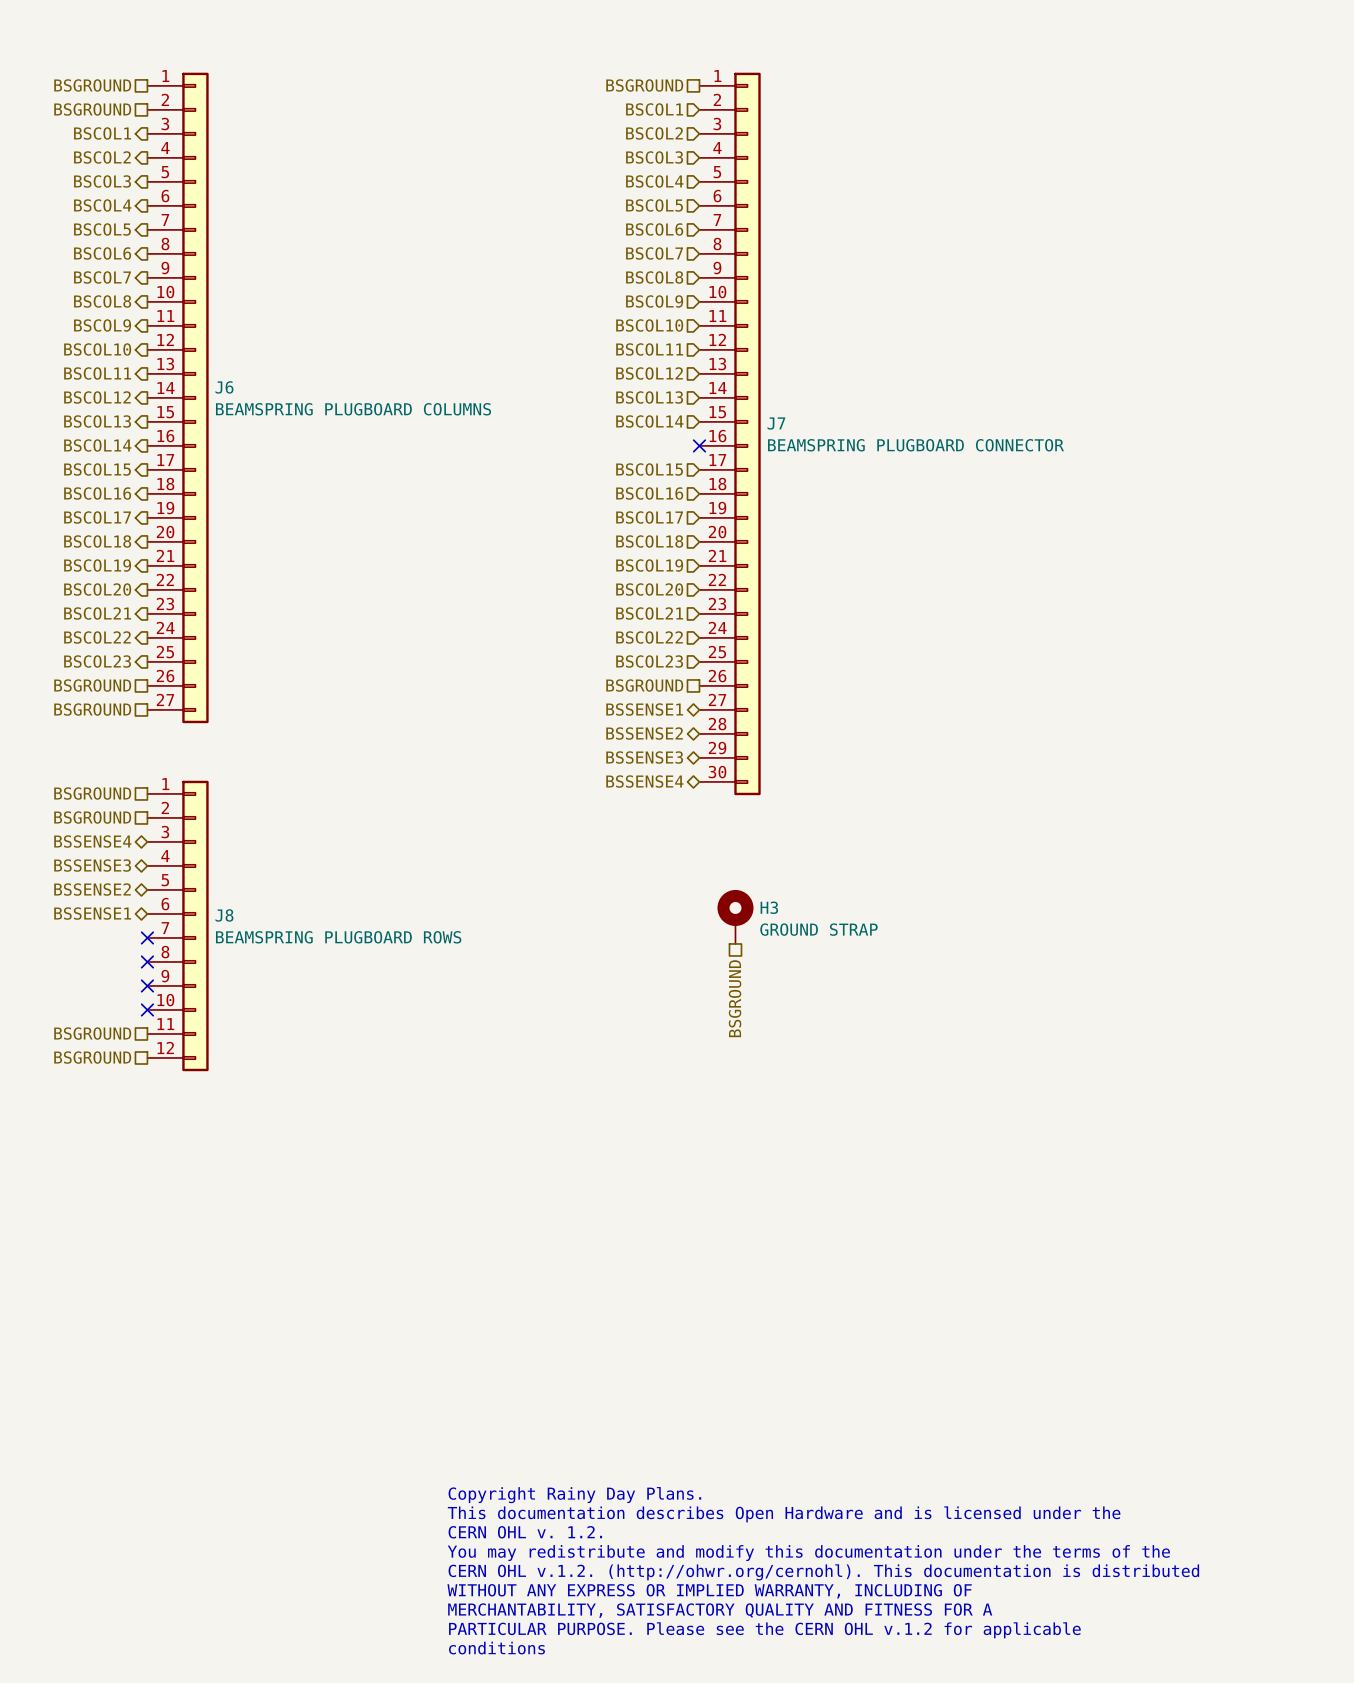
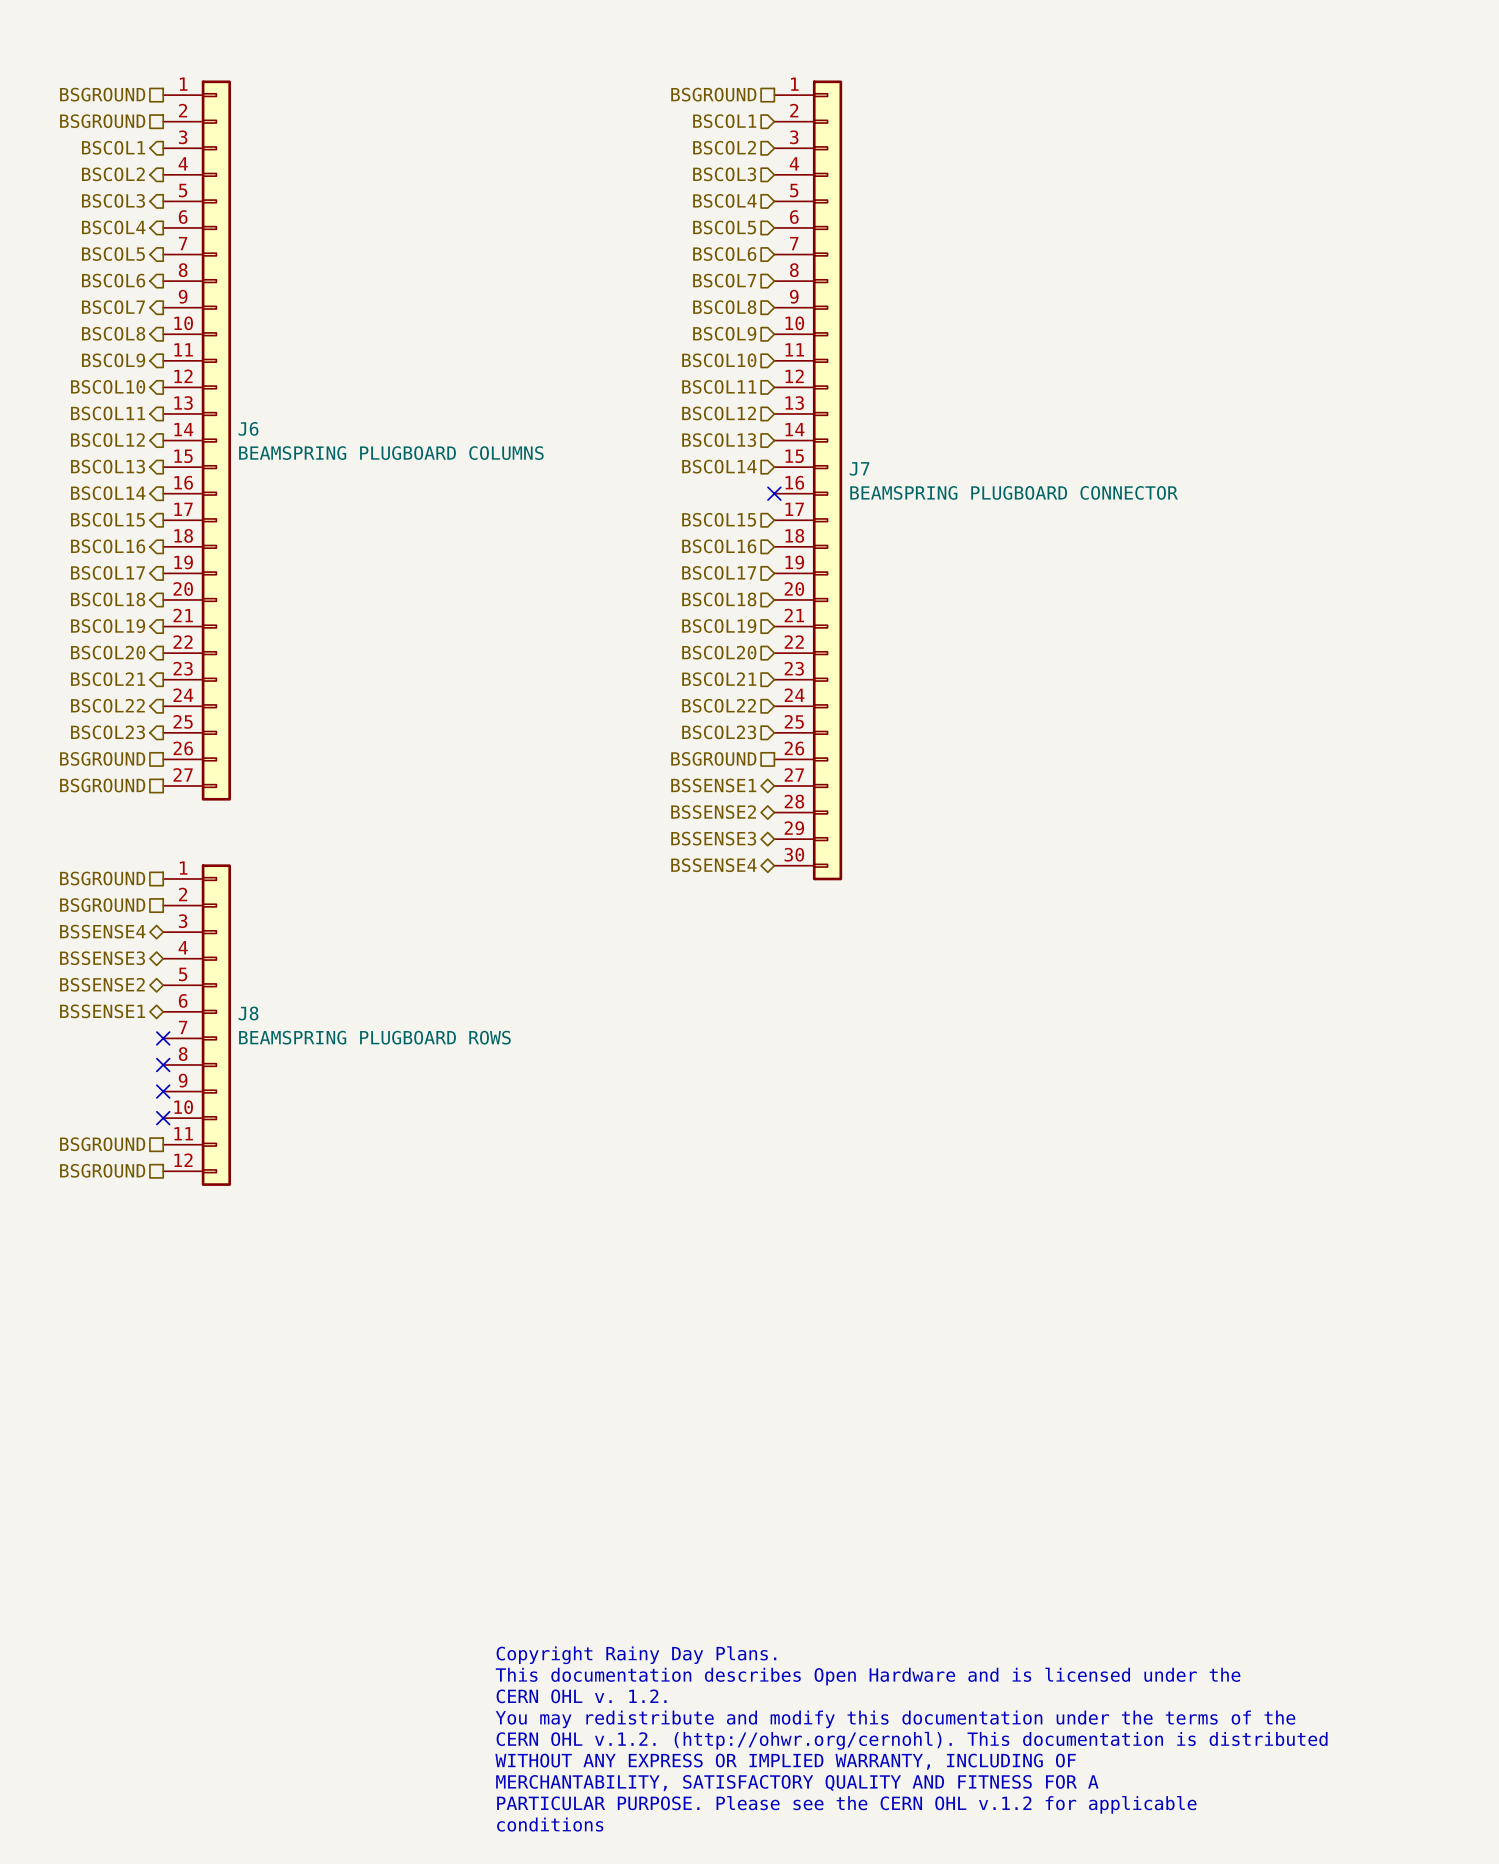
H3: GROUND STRAP (735, 916) -> none
hierarchical label: BSGROUND (735, 998) -> none

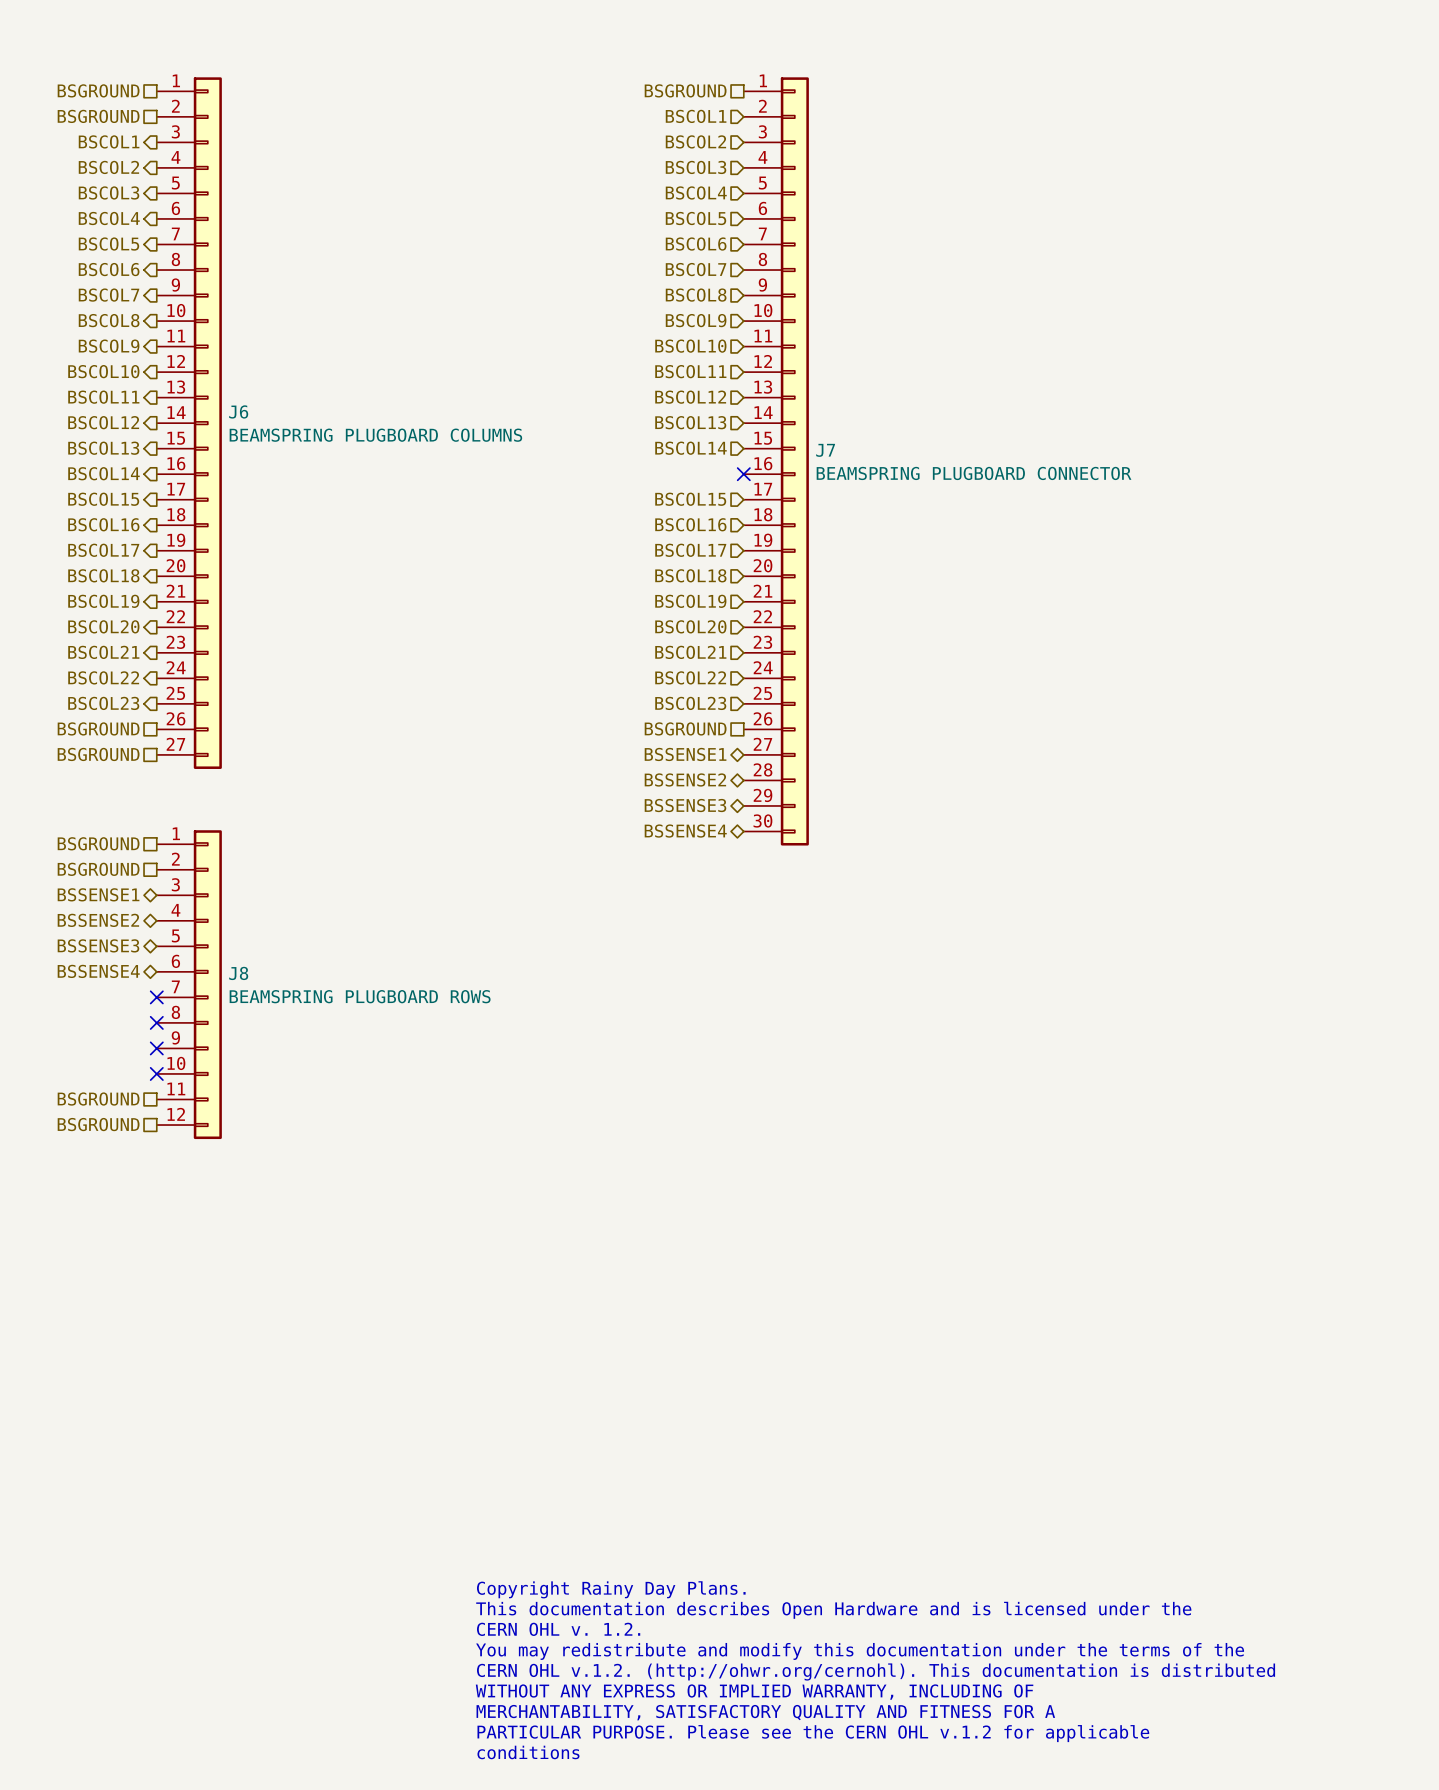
hierarchical label: BSSENSE4 (102, 931) -> BSSENSE1 (98, 894)
hierarchical label: BSSENSE3 (102, 958) -> BSSENSE2 (98, 920)
hierarchical label: BSSENSE2 (102, 984) -> BSSENSE3 (98, 945)
hierarchical label: BSSENSE1 (102, 1011) -> BSSENSE4 (98, 971)

